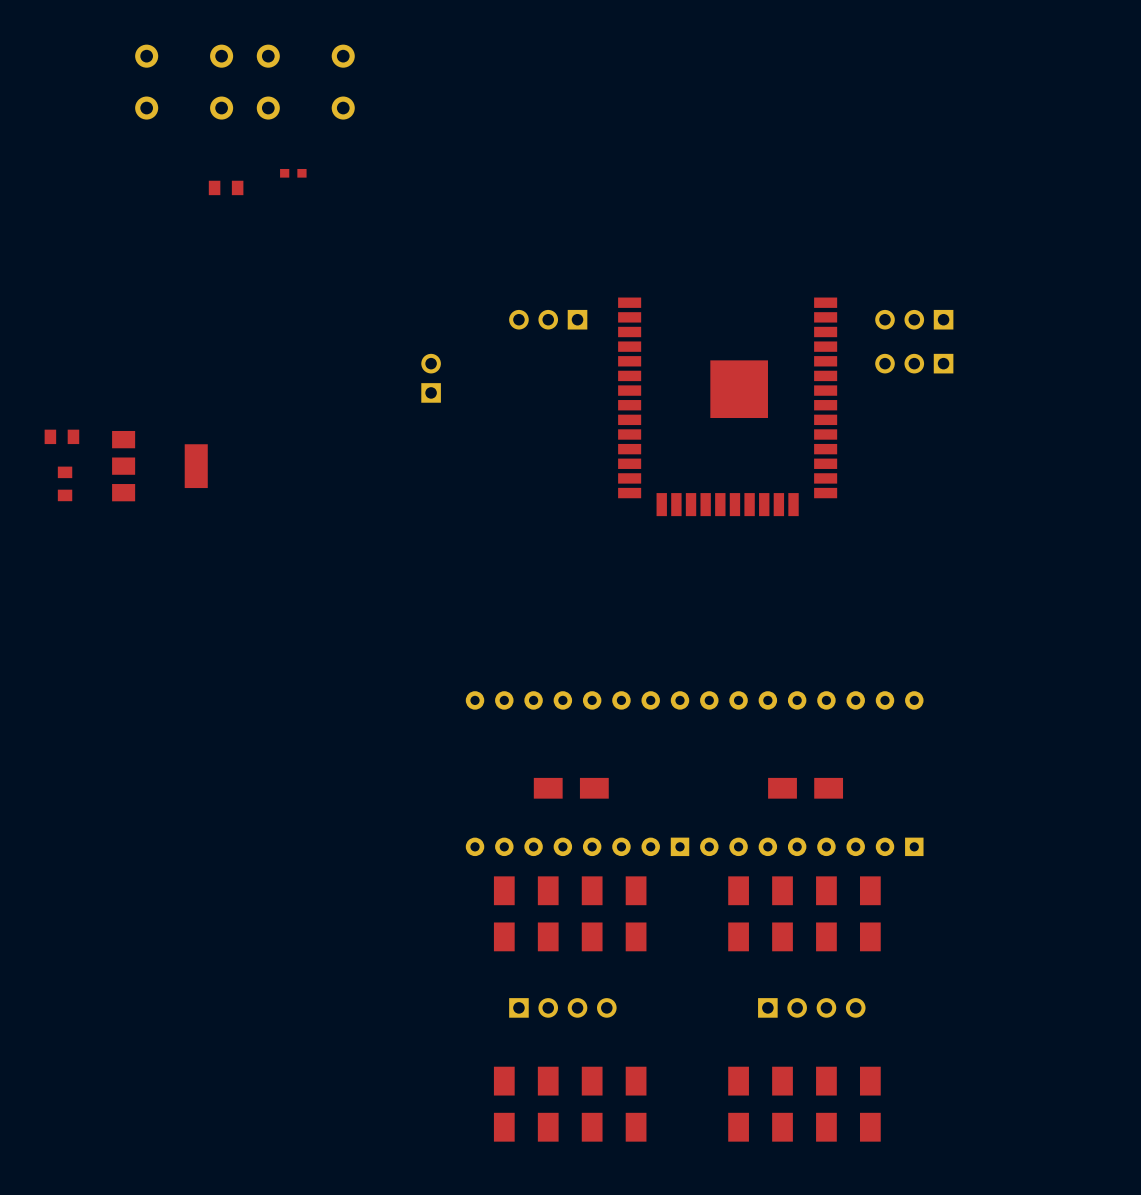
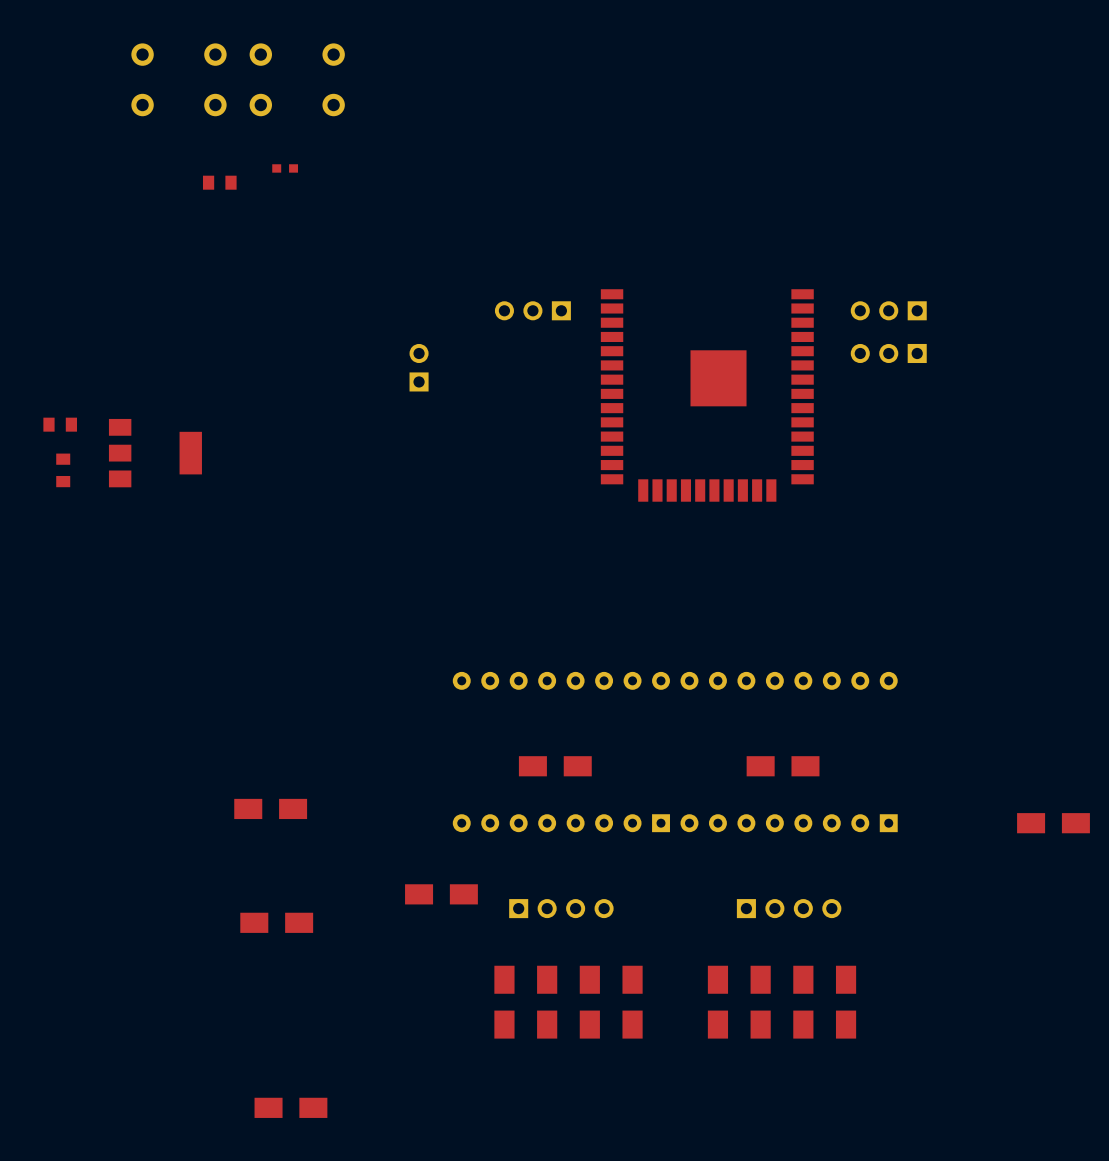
part: none -> (270, 808)
part: none -> (1053, 823)
part: (504, 913) -> none
part: (548, 913) -> none
part: (592, 913) -> none
part: (636, 913) -> none
part: (738, 913) -> none
part: (782, 913) -> none
part: (826, 913) -> none
part: (870, 913) -> none
part: none -> (441, 894)
part: none -> (276, 922)
part position: (562, 1007) -> (561, 908)
part position: (811, 1007) -> (789, 908)
part: none -> (504, 1002)
part: none -> (547, 1002)
part: none -> (589, 1002)
part: none -> (632, 1002)
part: none -> (717, 1002)
part: none -> (760, 1002)
part: none -> (803, 1002)
part: none -> (846, 1002)
part: (504, 1104) -> none
part: (548, 1104) -> none
part: (592, 1104) -> none
part: (636, 1104) -> none
part: (738, 1104) -> none
part: (782, 1104) -> none
part: (826, 1104) -> none
part: (870, 1104) -> none
part: none -> (290, 1107)

